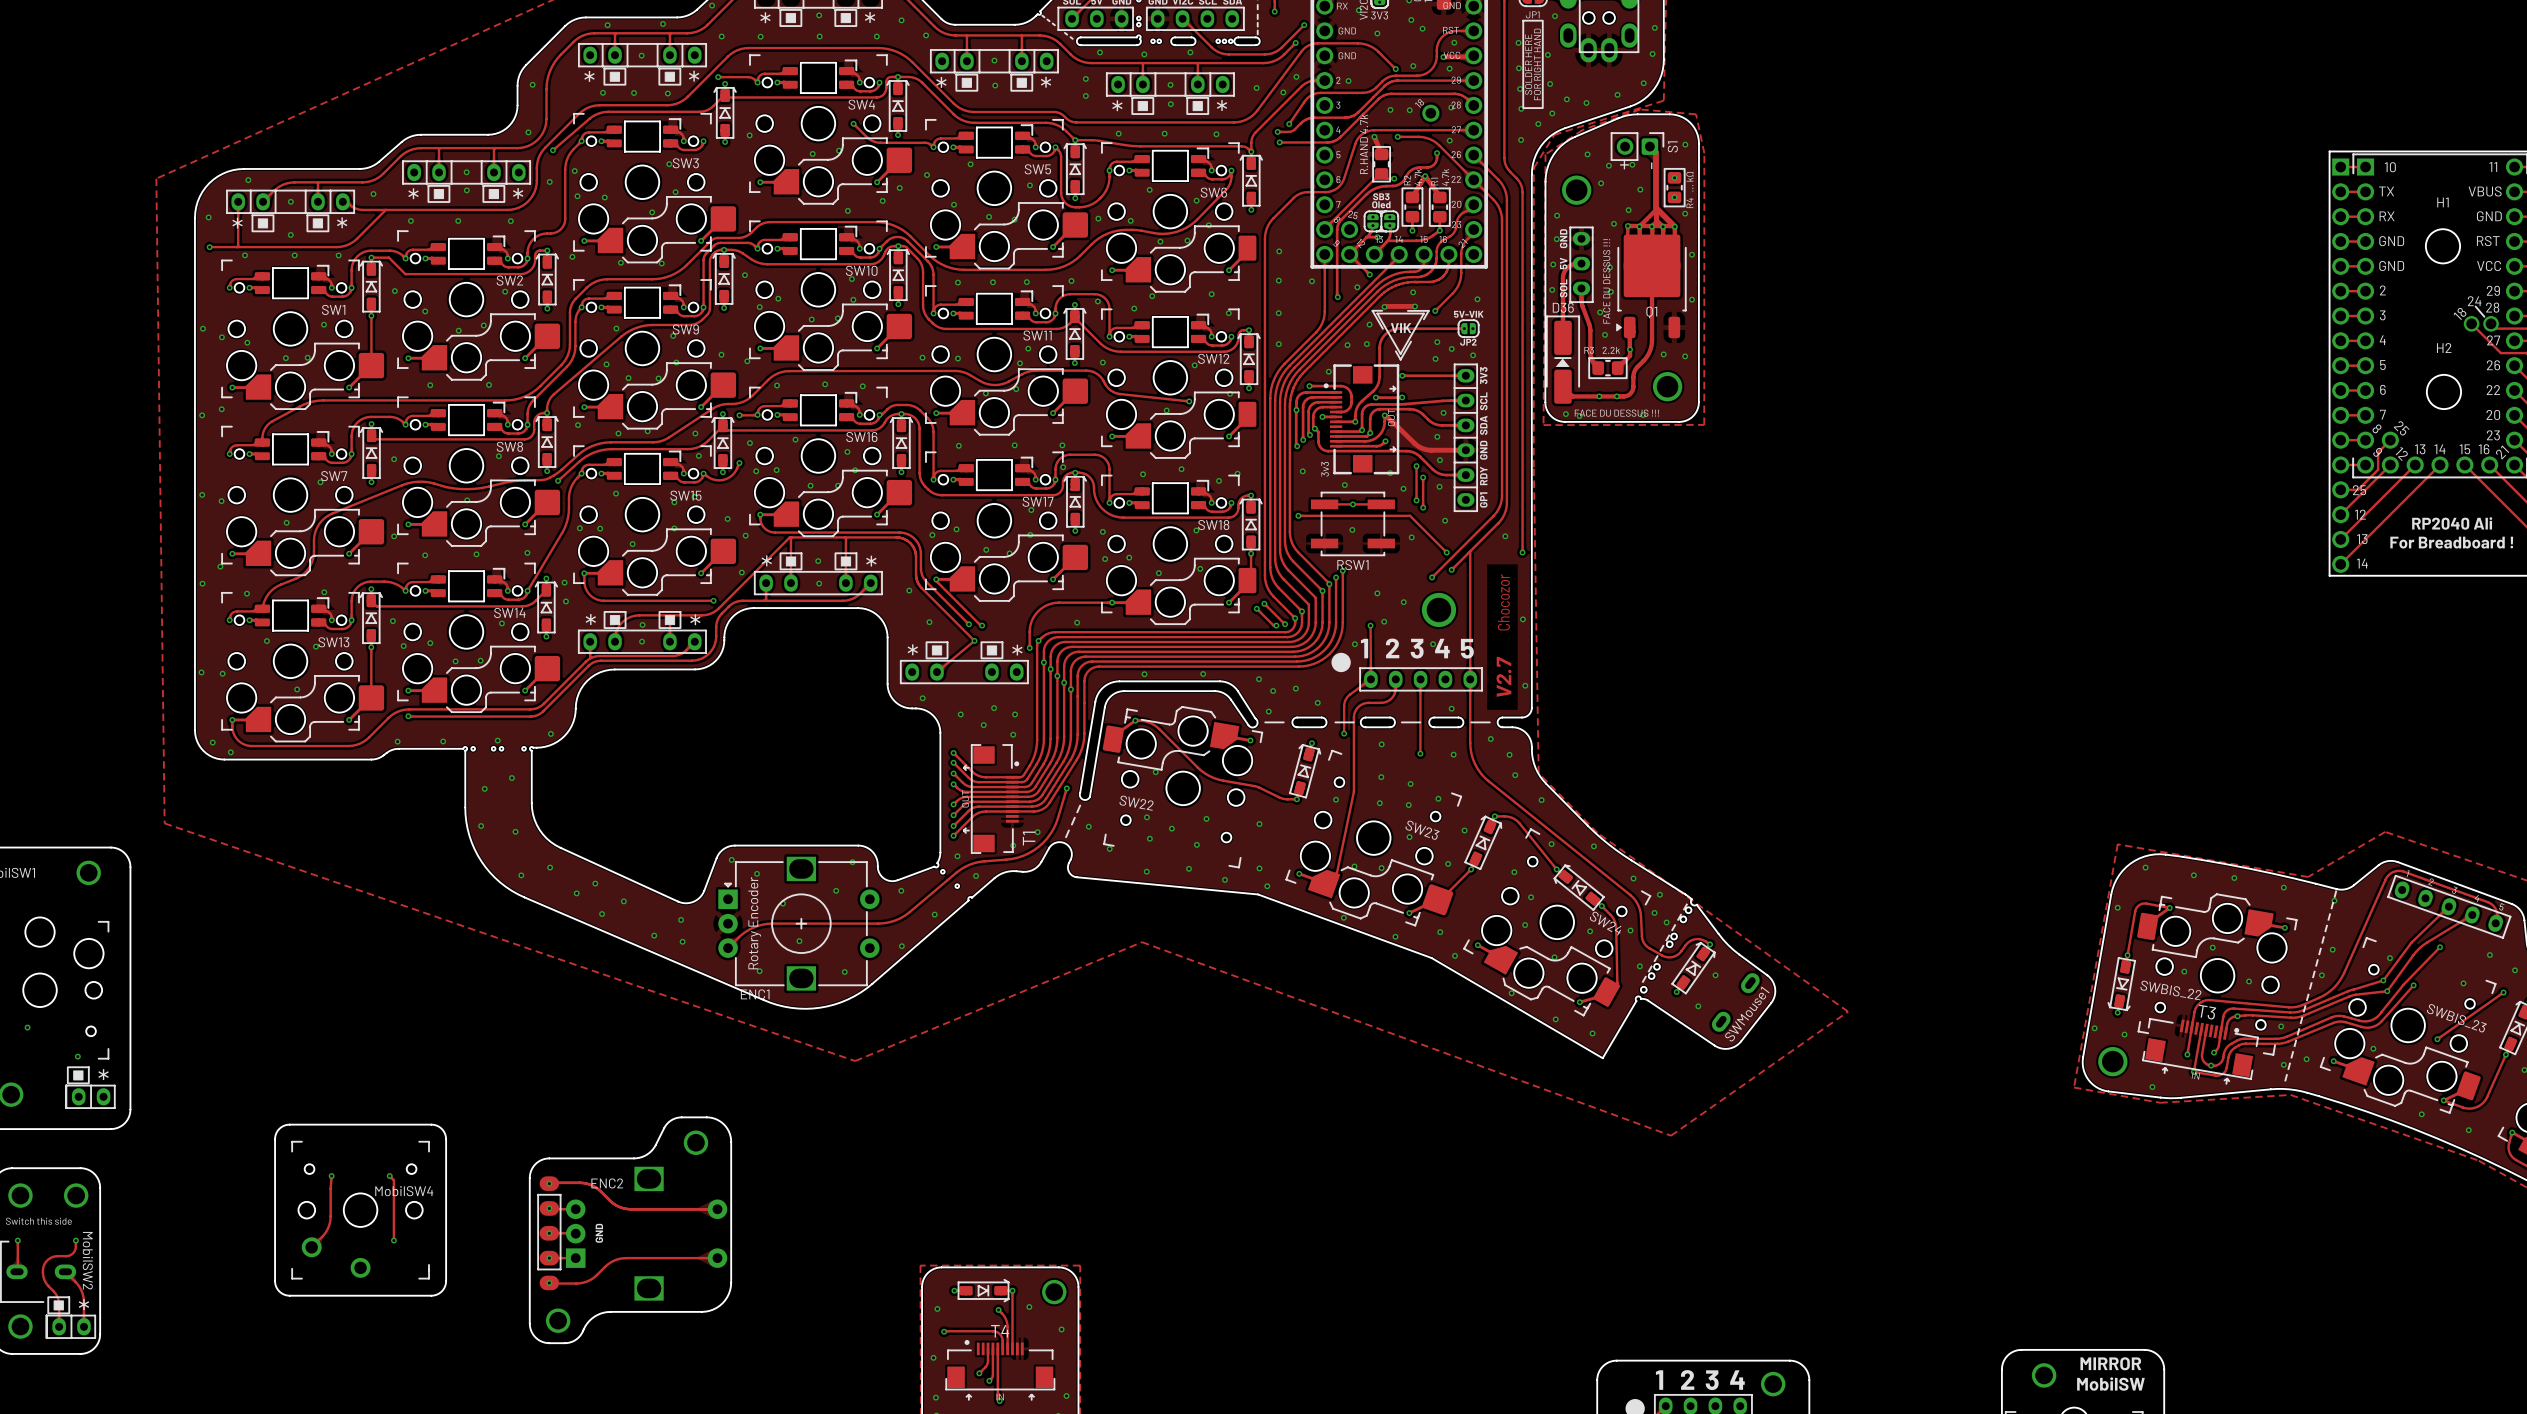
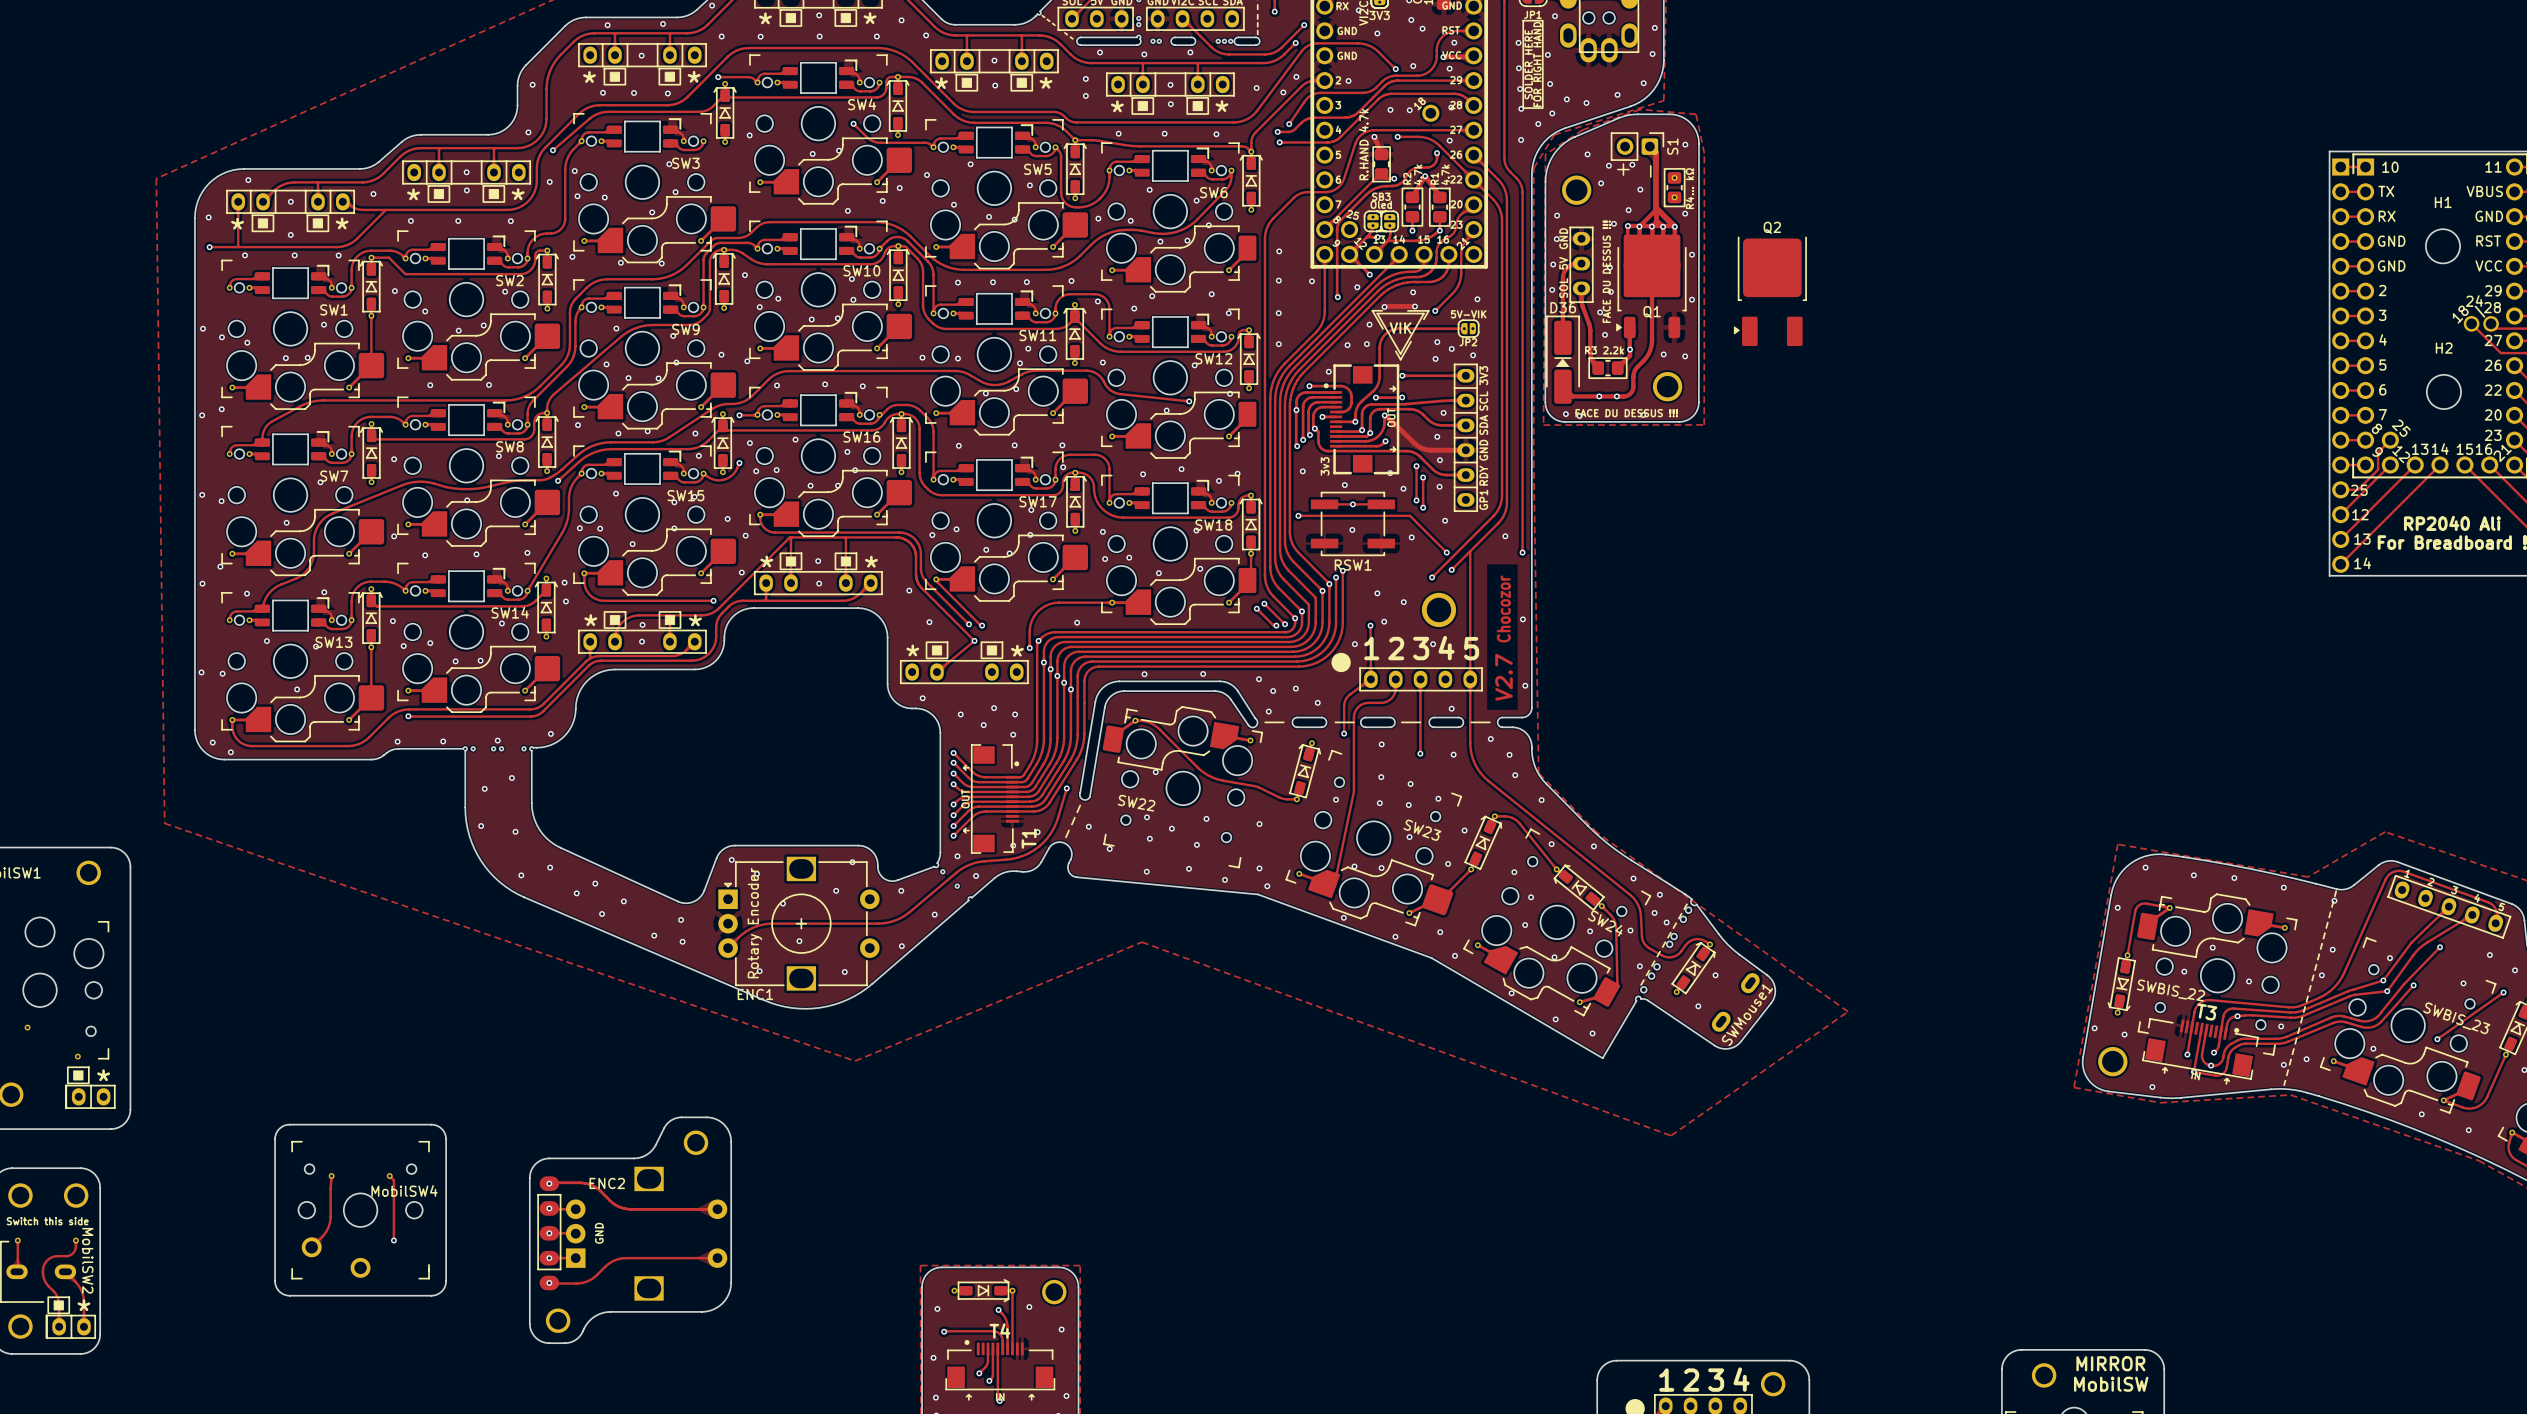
Q2: none -> (1770, 291)

